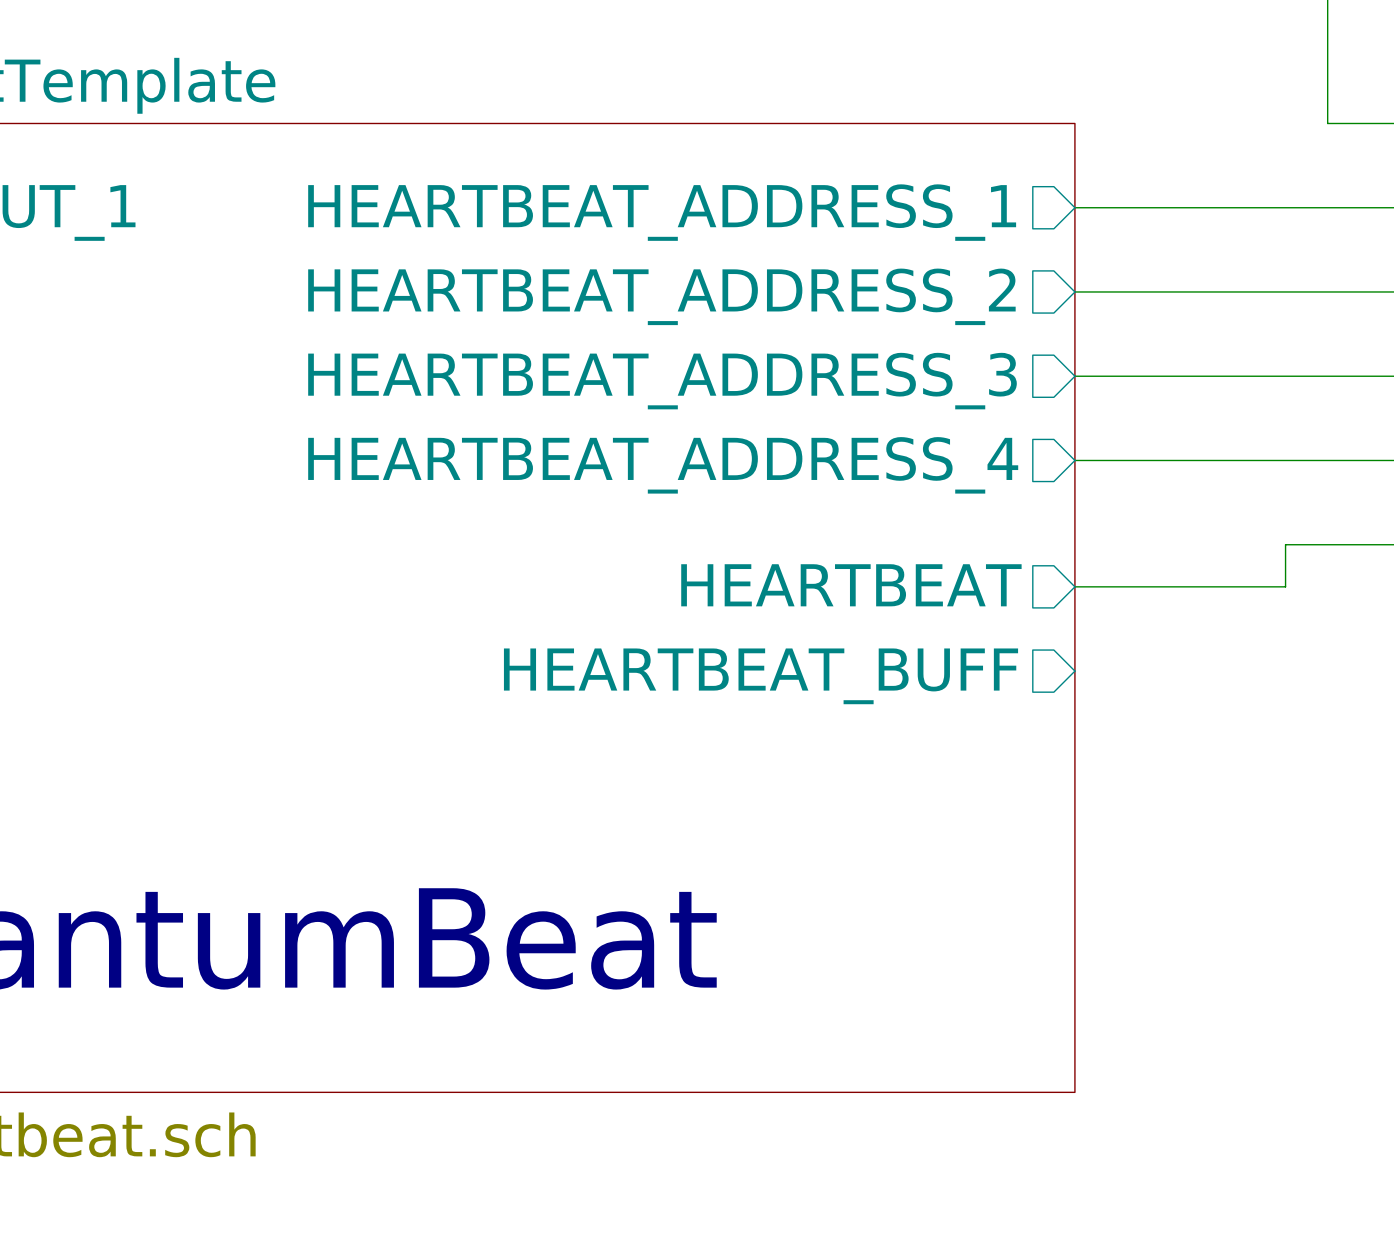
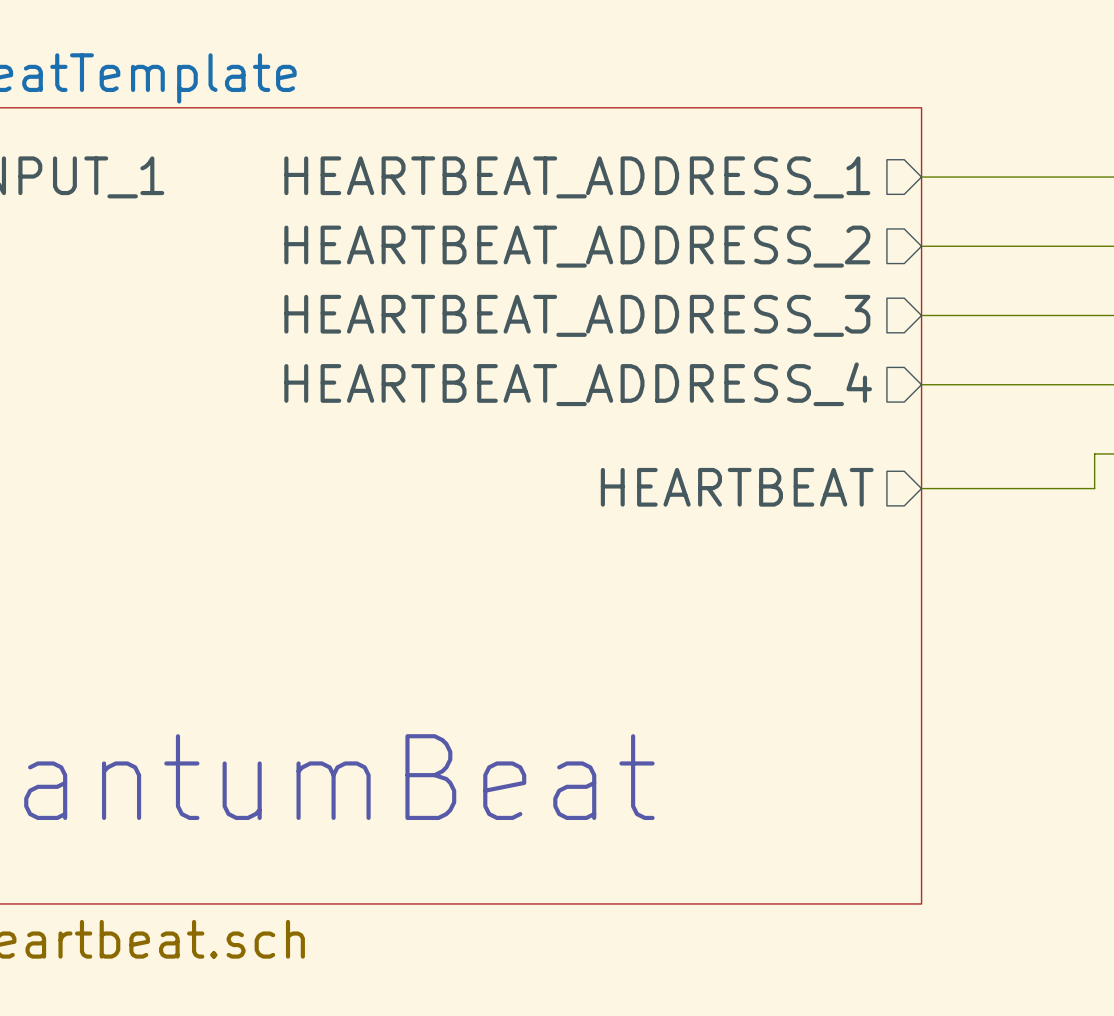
sheet pin: HEARTBEAT_BUFF (761, 676) -> none

